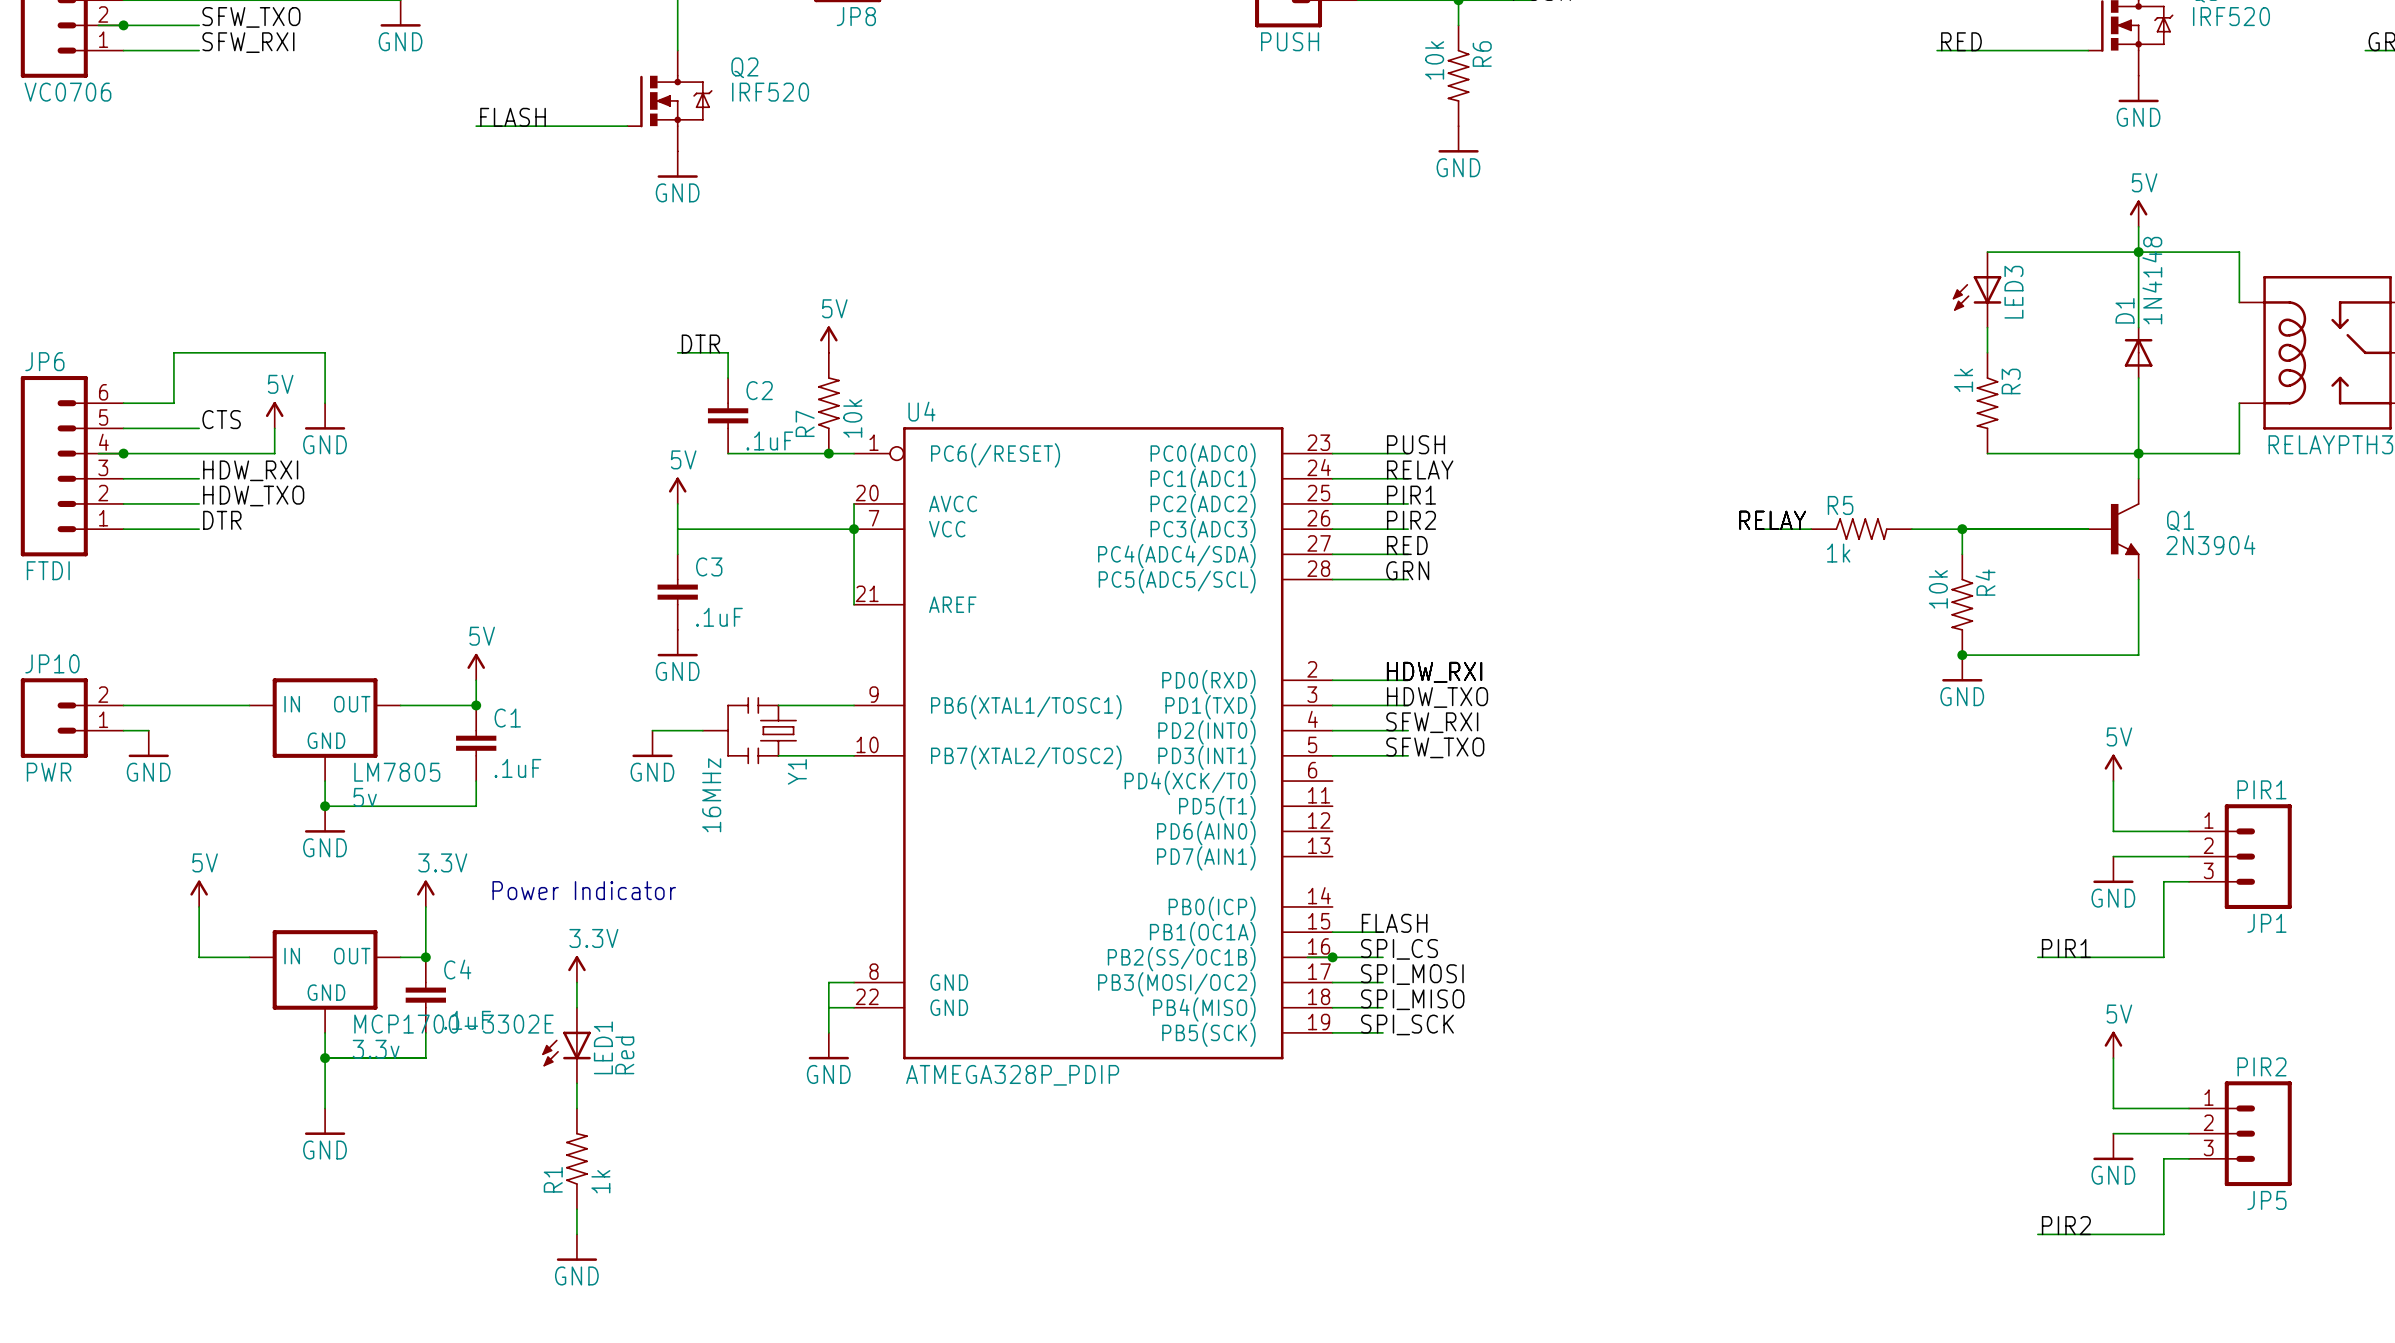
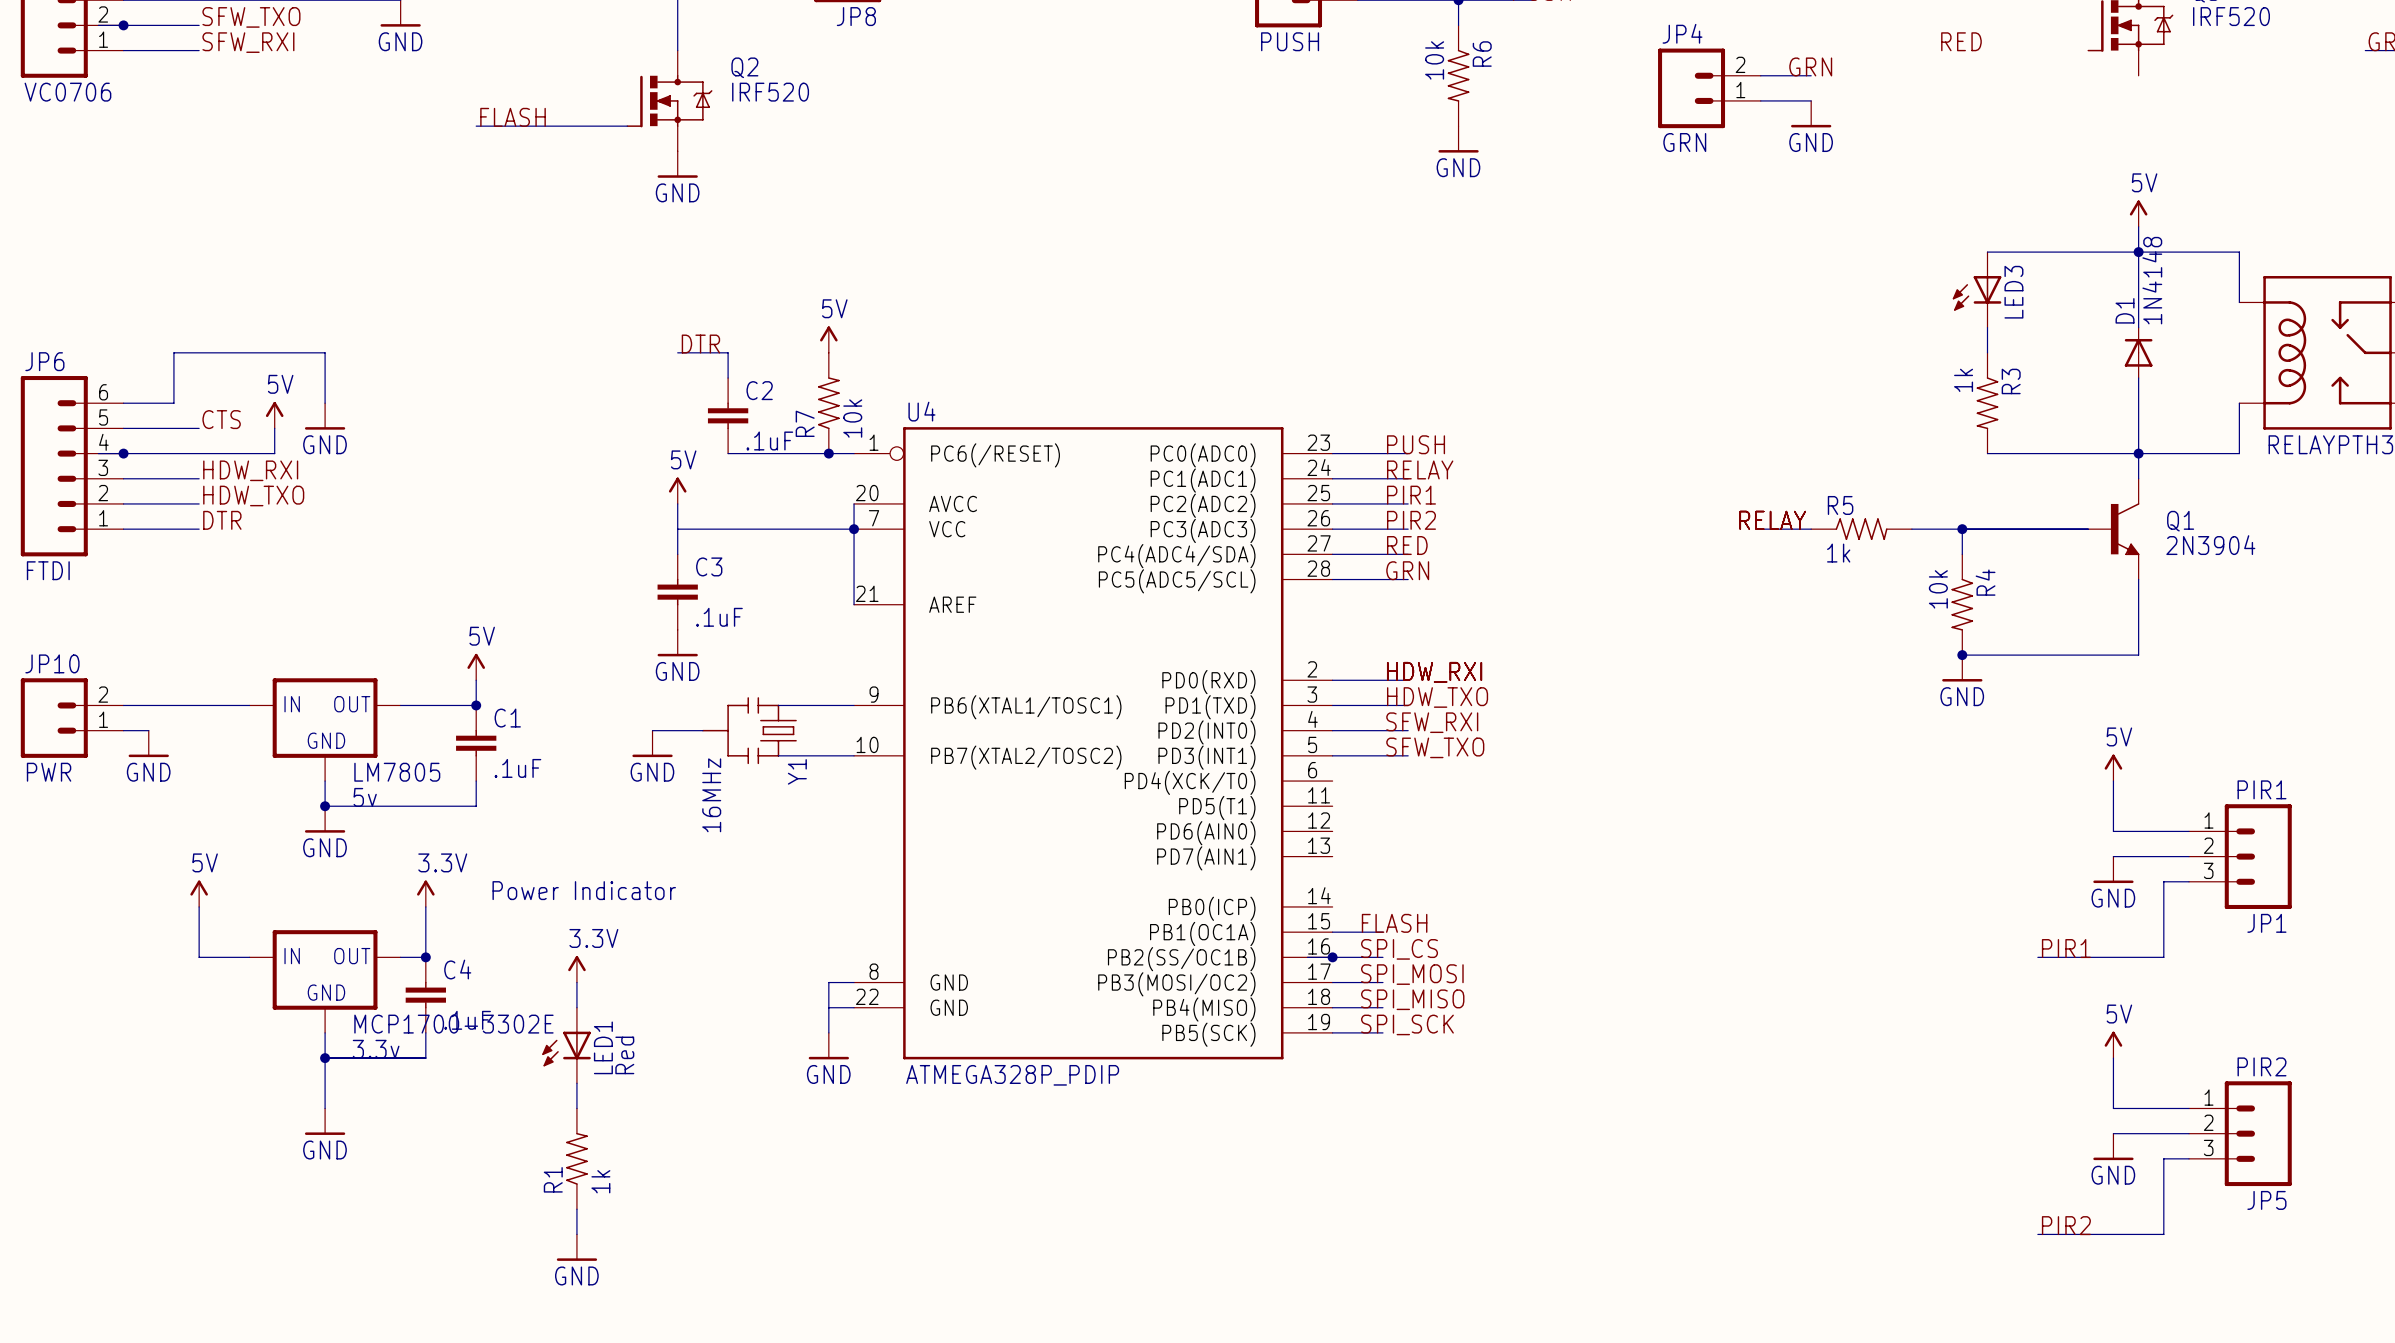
wire: (1937, 50) (2088, 50) -> none
label: none -> GRN (1810, 66)
wire: none -> (1760, 75) (1811, 75)
JP4: none -> GRN (1709, 88)
power symbol: GND (2138, 88) -> none
wire: none -> (1760, 100) (1811, 100)
power symbol: none -> GND (1811, 114)

